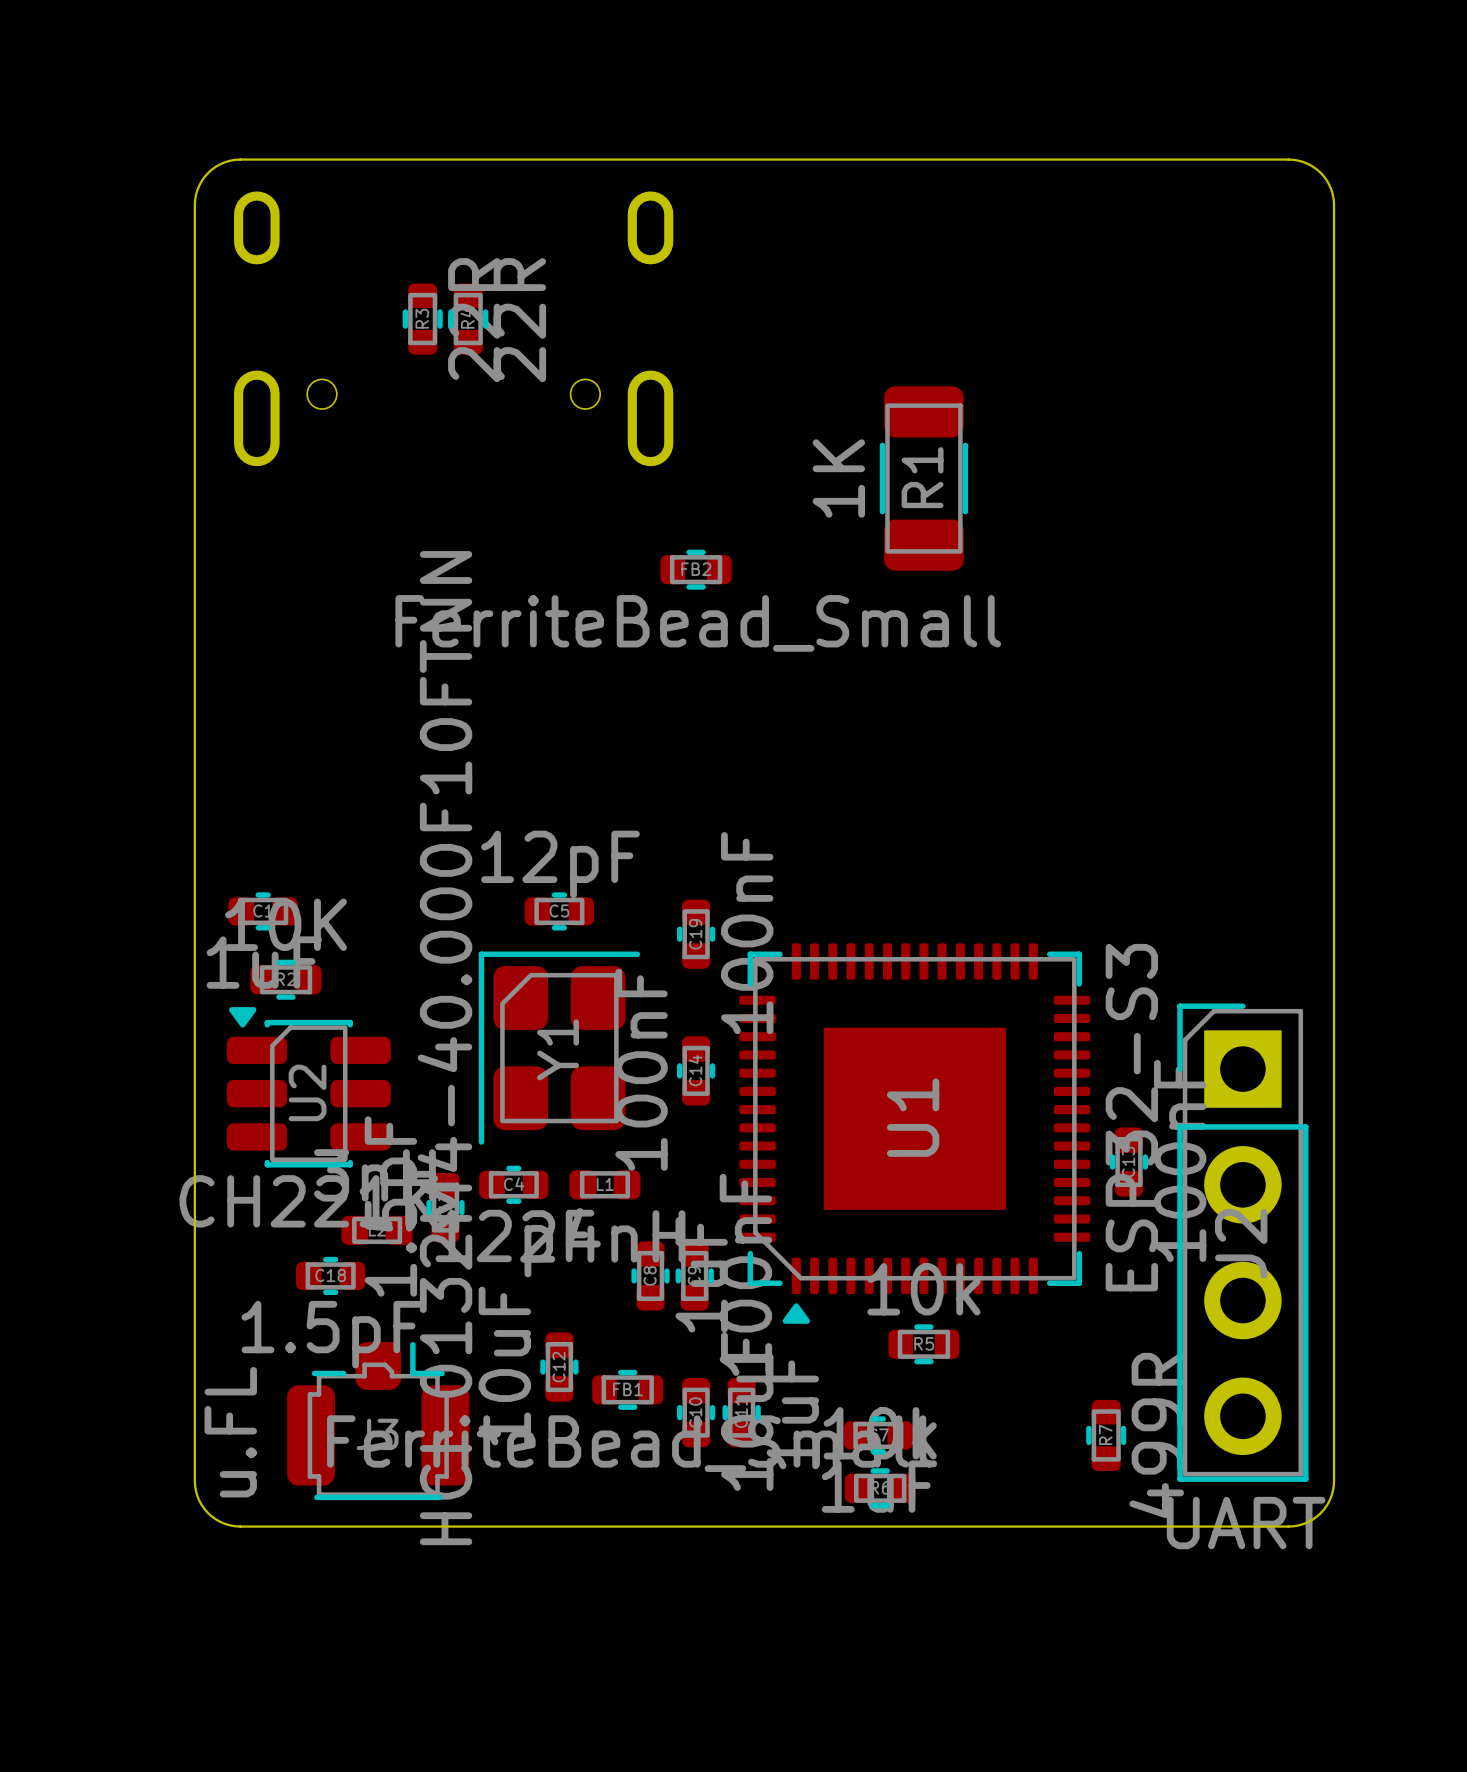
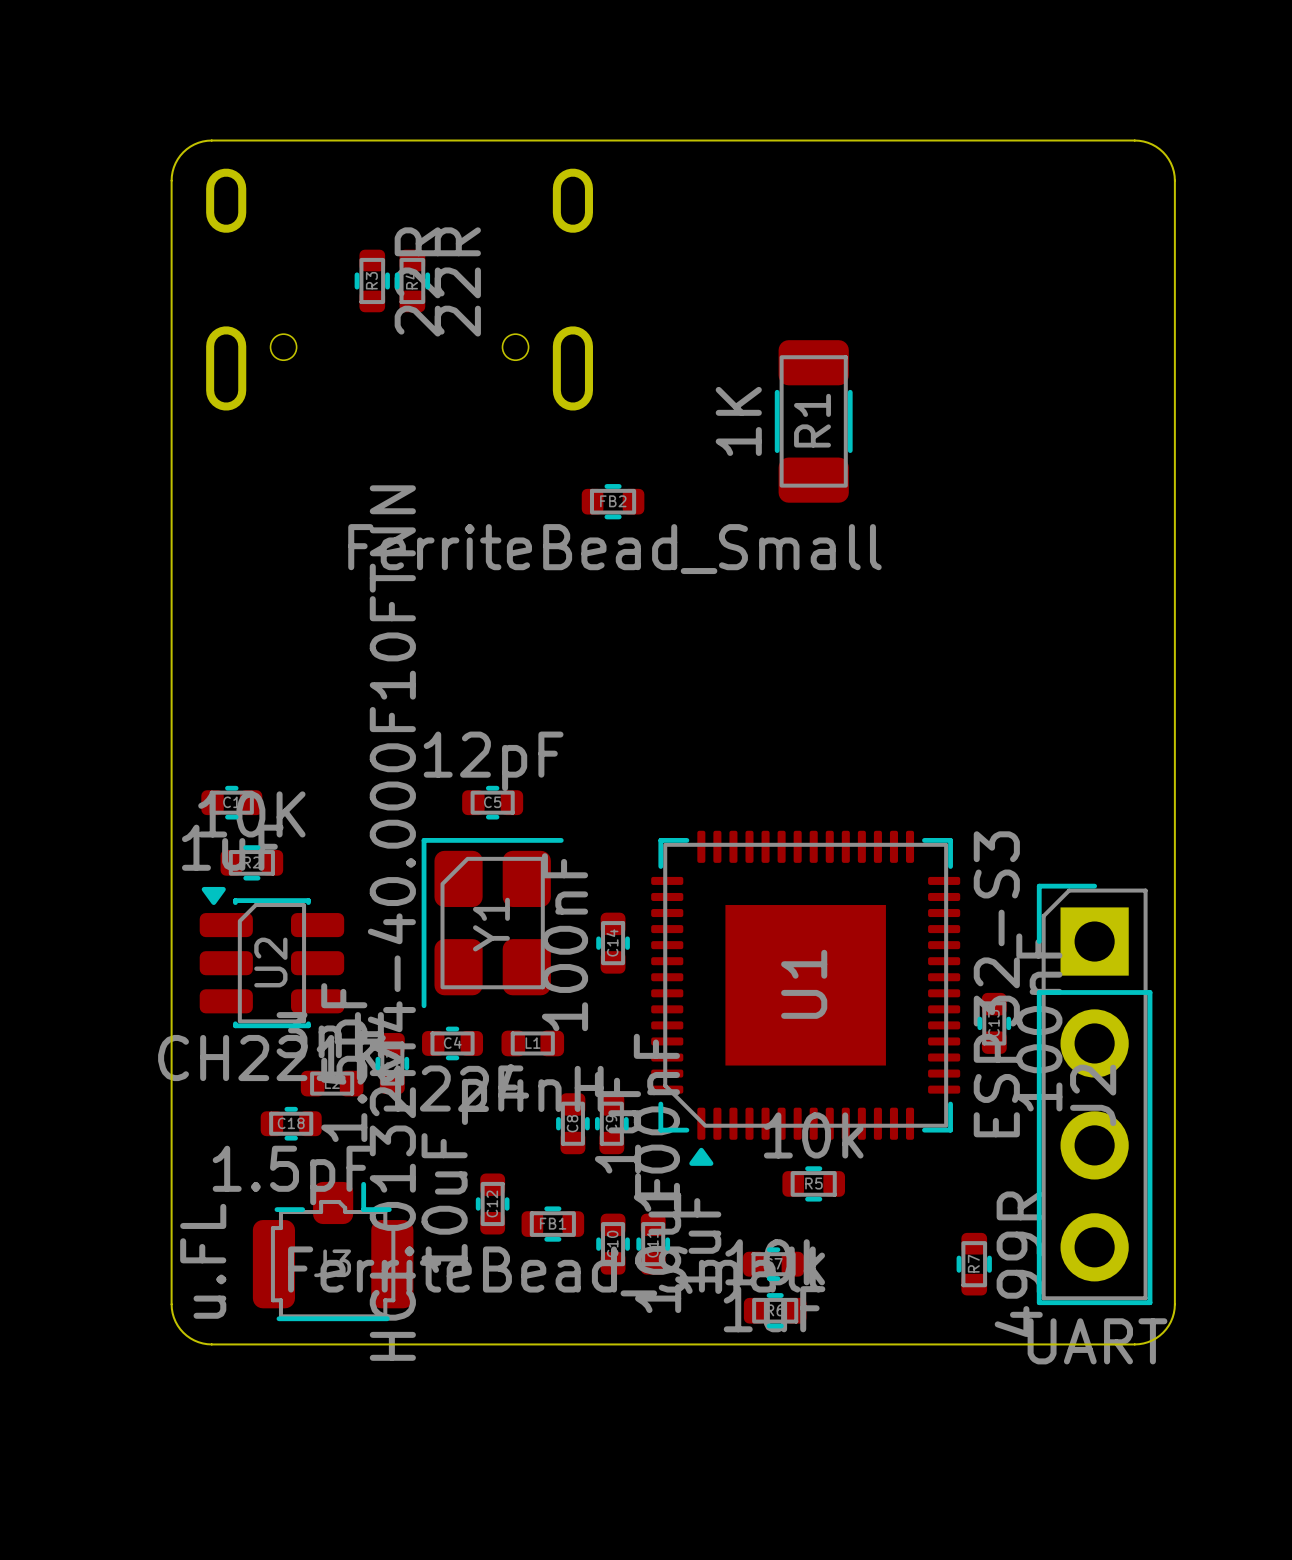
C19: 100nF (696, 934) -> none

